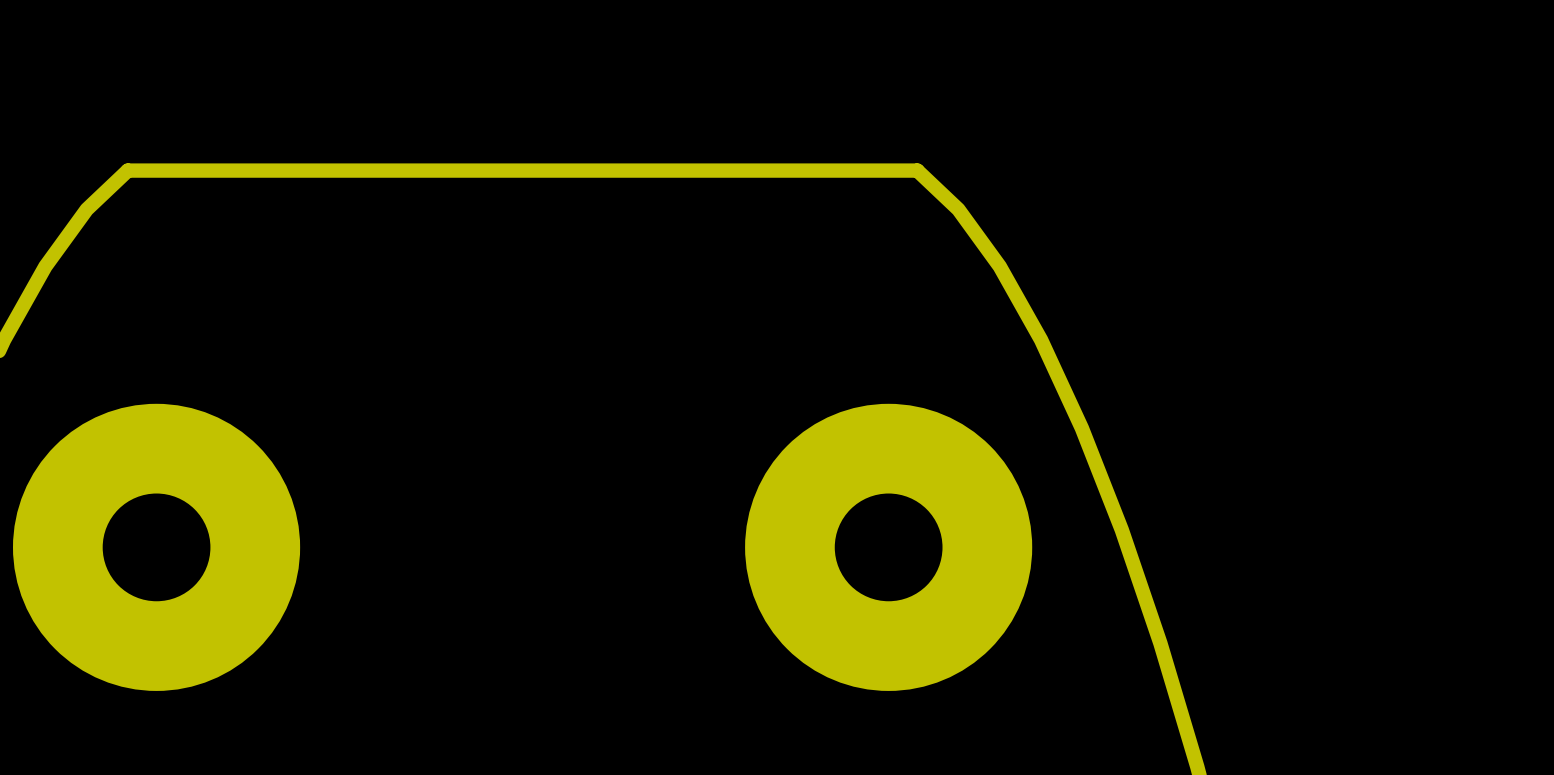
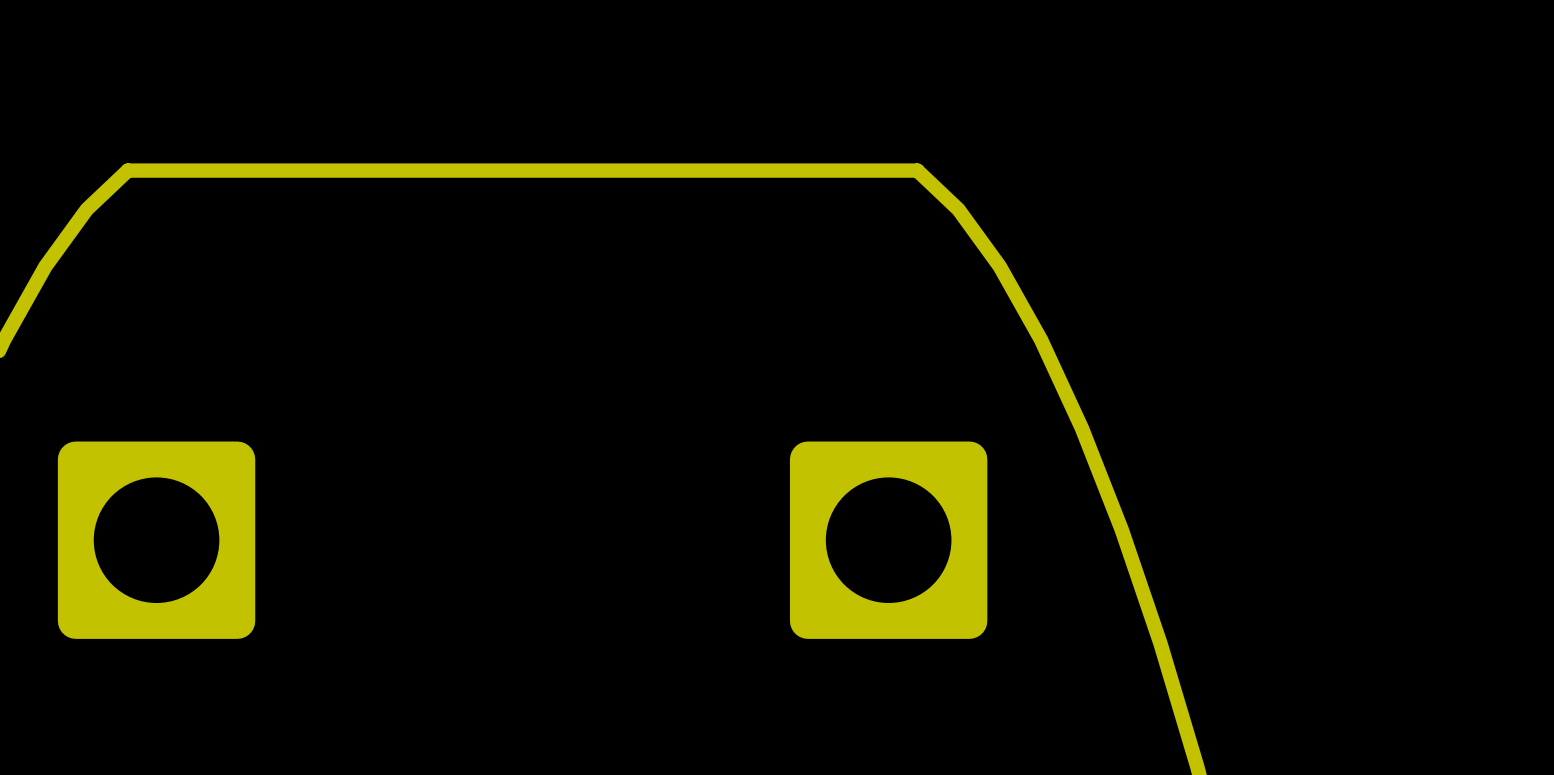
part footprint: [12, 403, 301, 691] -> [57, 441, 256, 639]
part footprint: [745, 403, 1033, 691] -> [789, 441, 988, 639]

